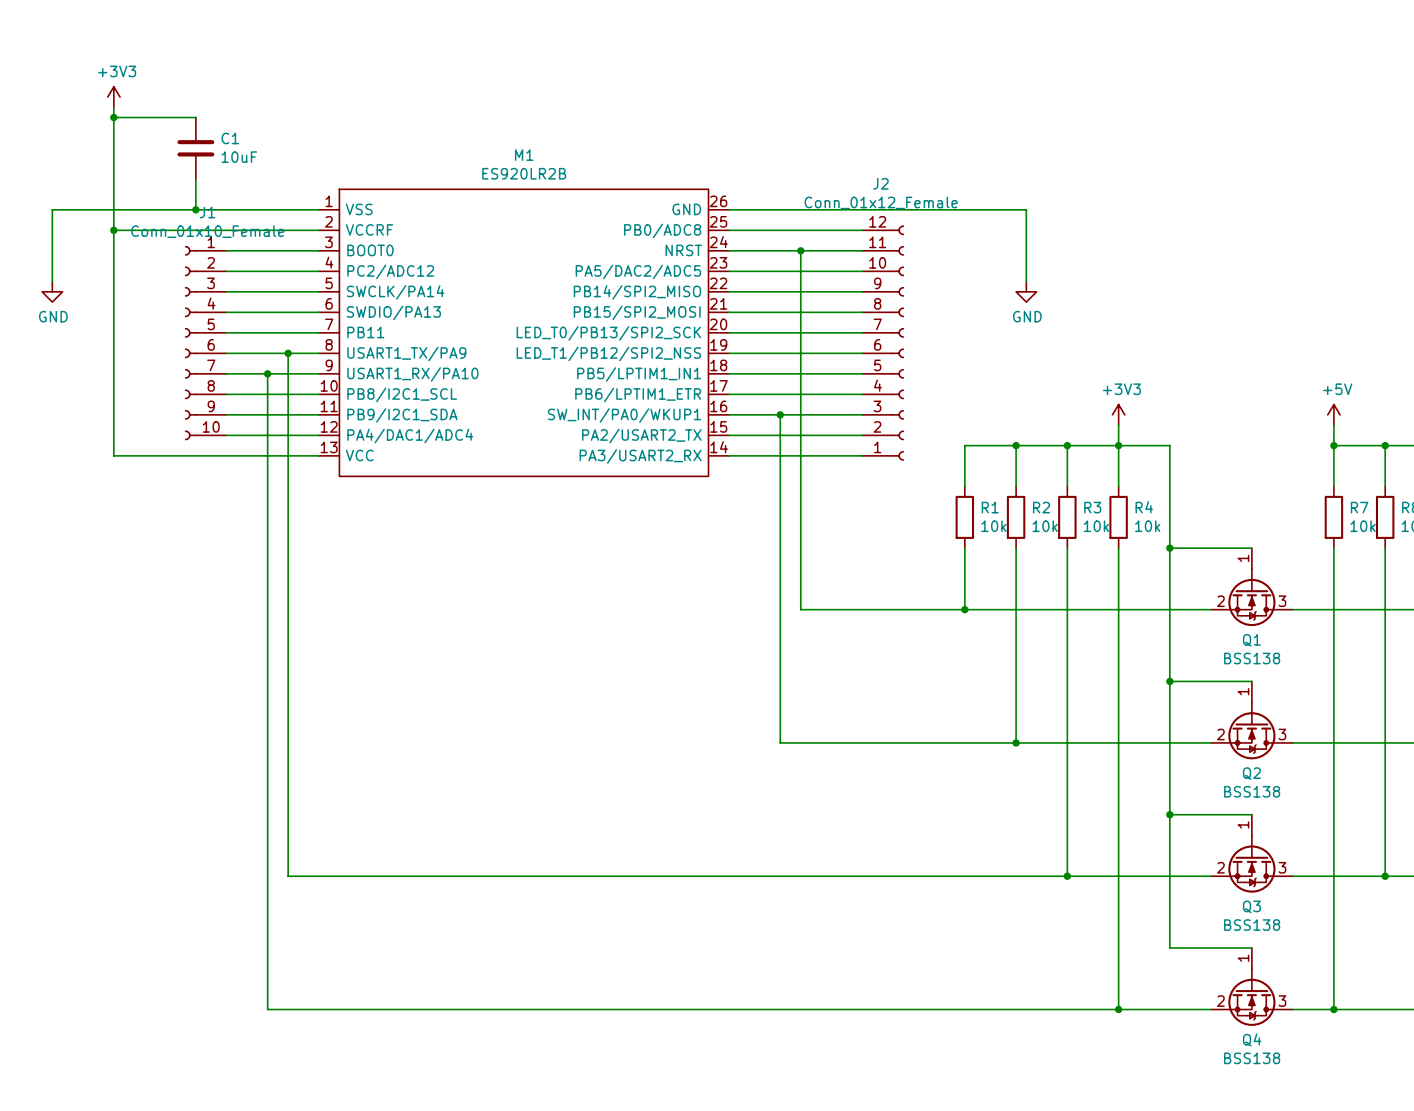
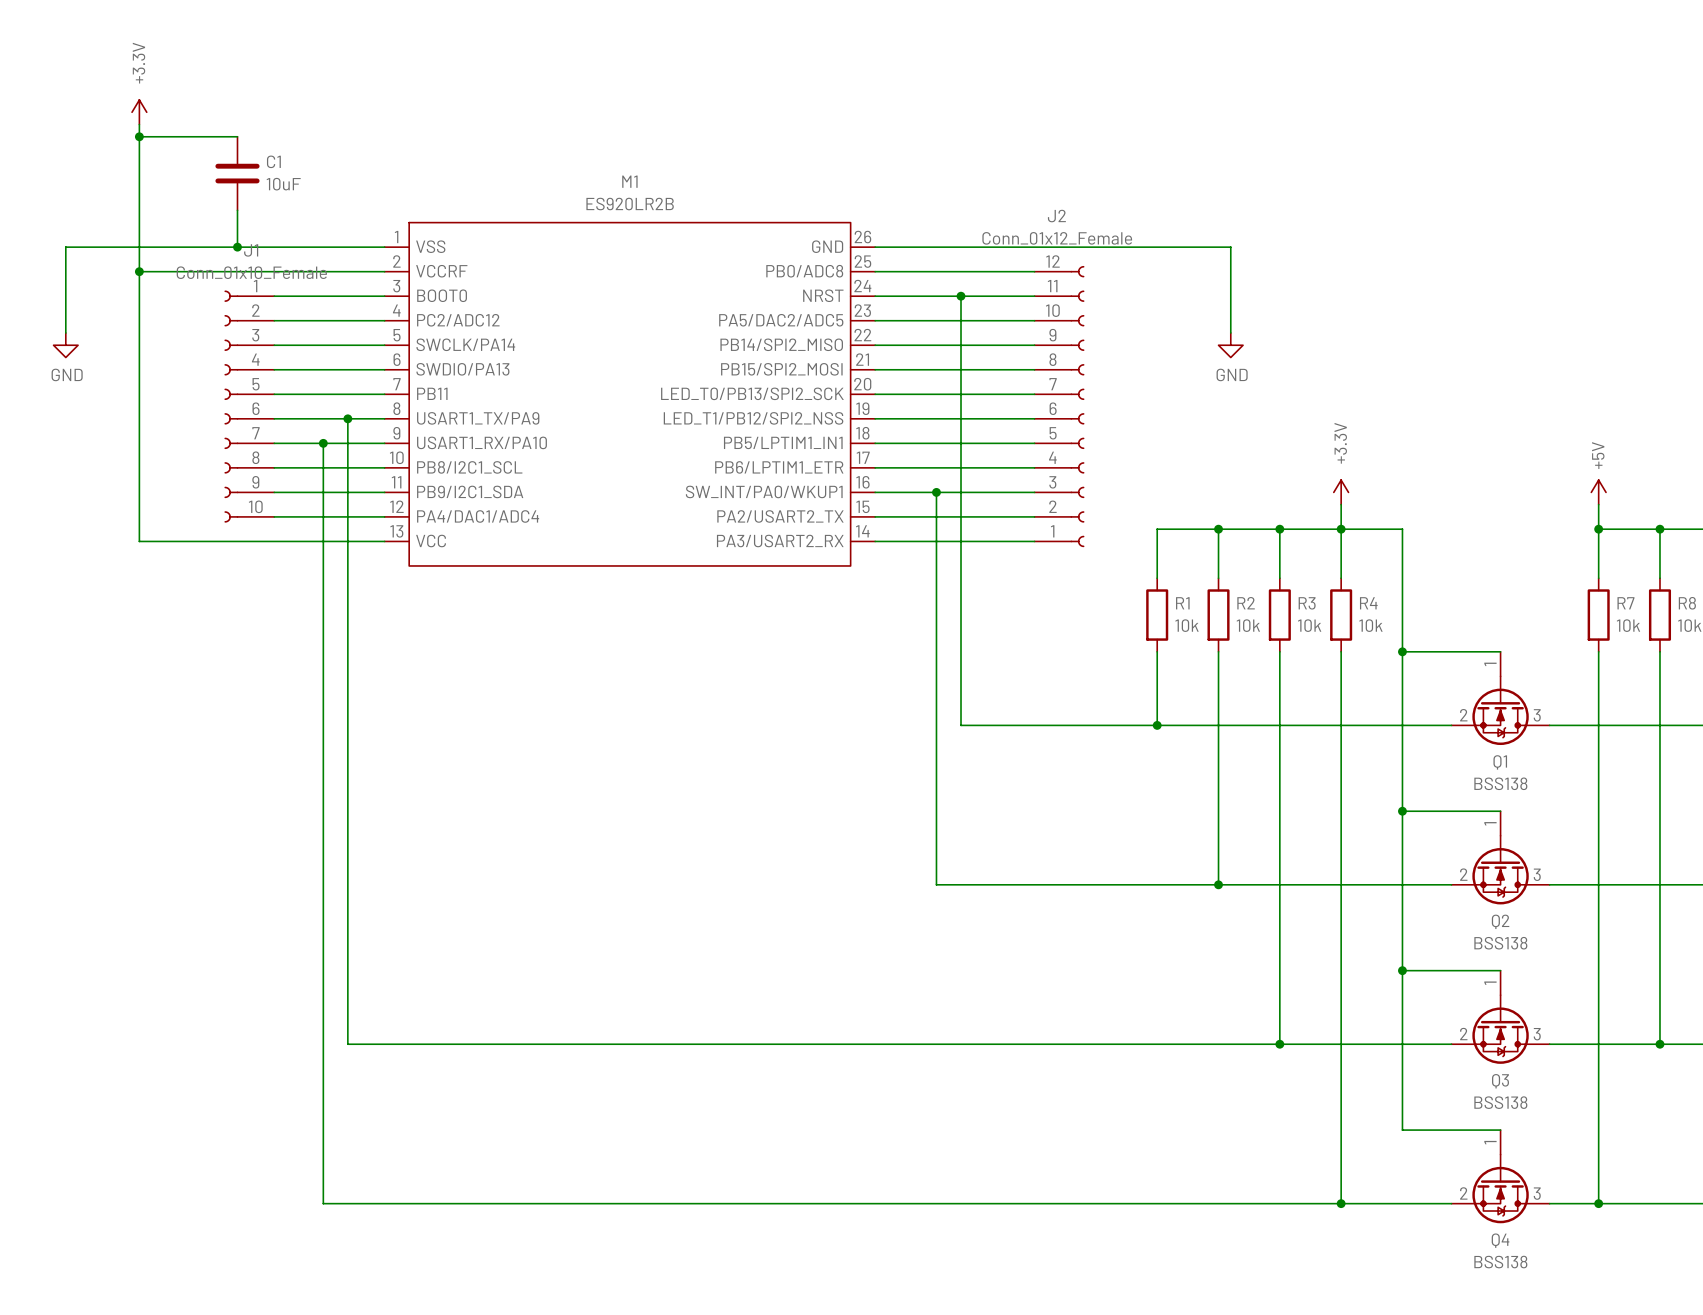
power symbol: +3V3 (113, 97) -> +3.3V (139, 112)
power symbol text rotation: 0° (1337, 389) -> 90° counterclockwise (1598, 455)
power symbol: +3V3 (1118, 414) -> +3.3V (1341, 492)

